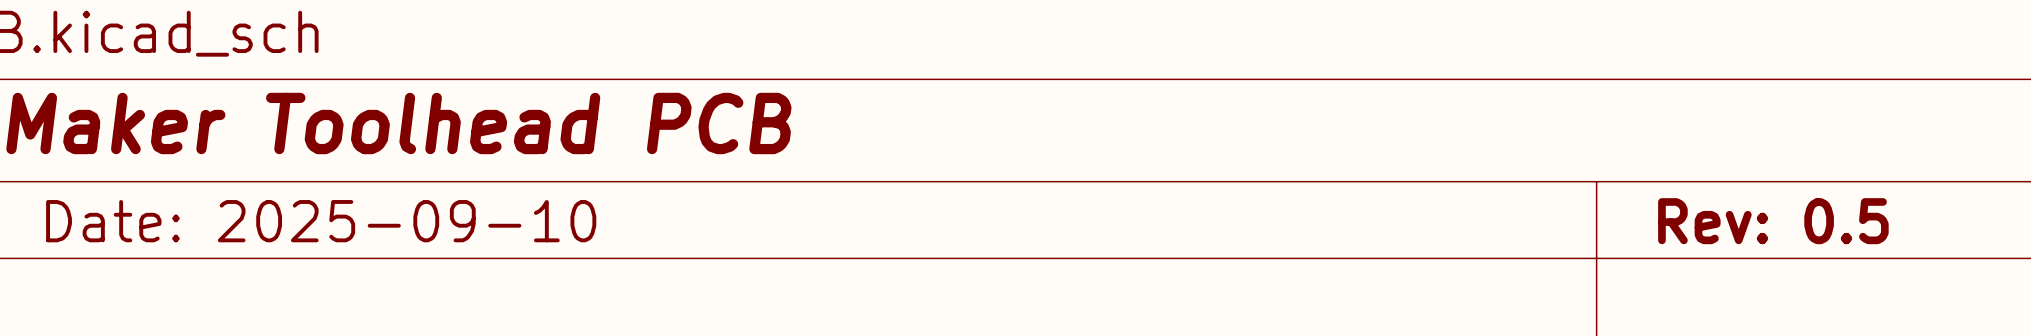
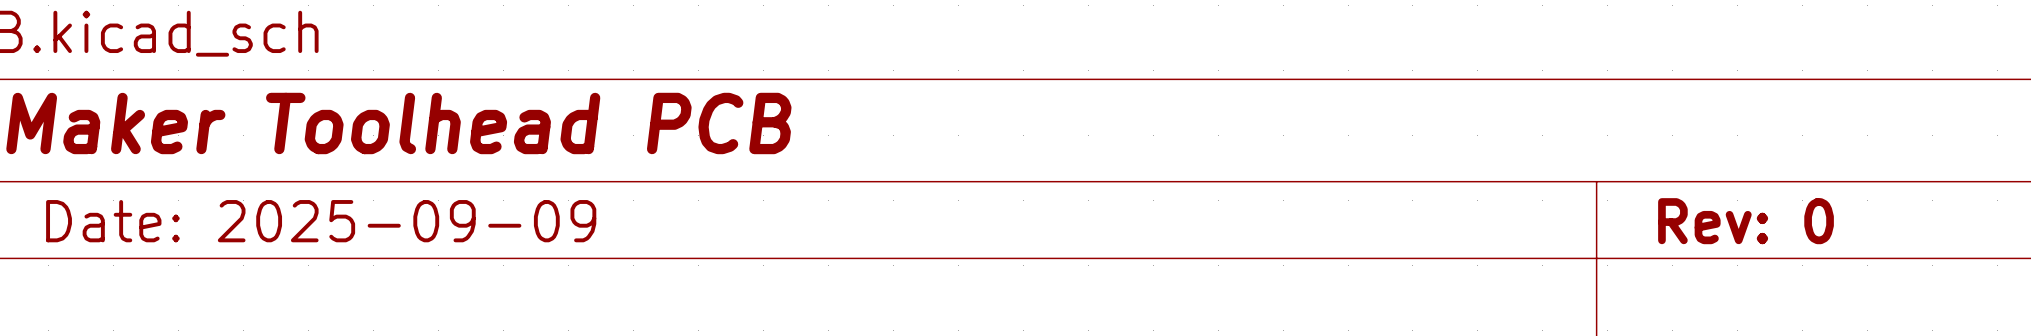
title block: Date: 2025-09-10 (321, 221) -> Date: 2025-09-09 (321, 221)
title block: Rev: 0.5 (1773, 221) -> Rev: 0 (1746, 221)

